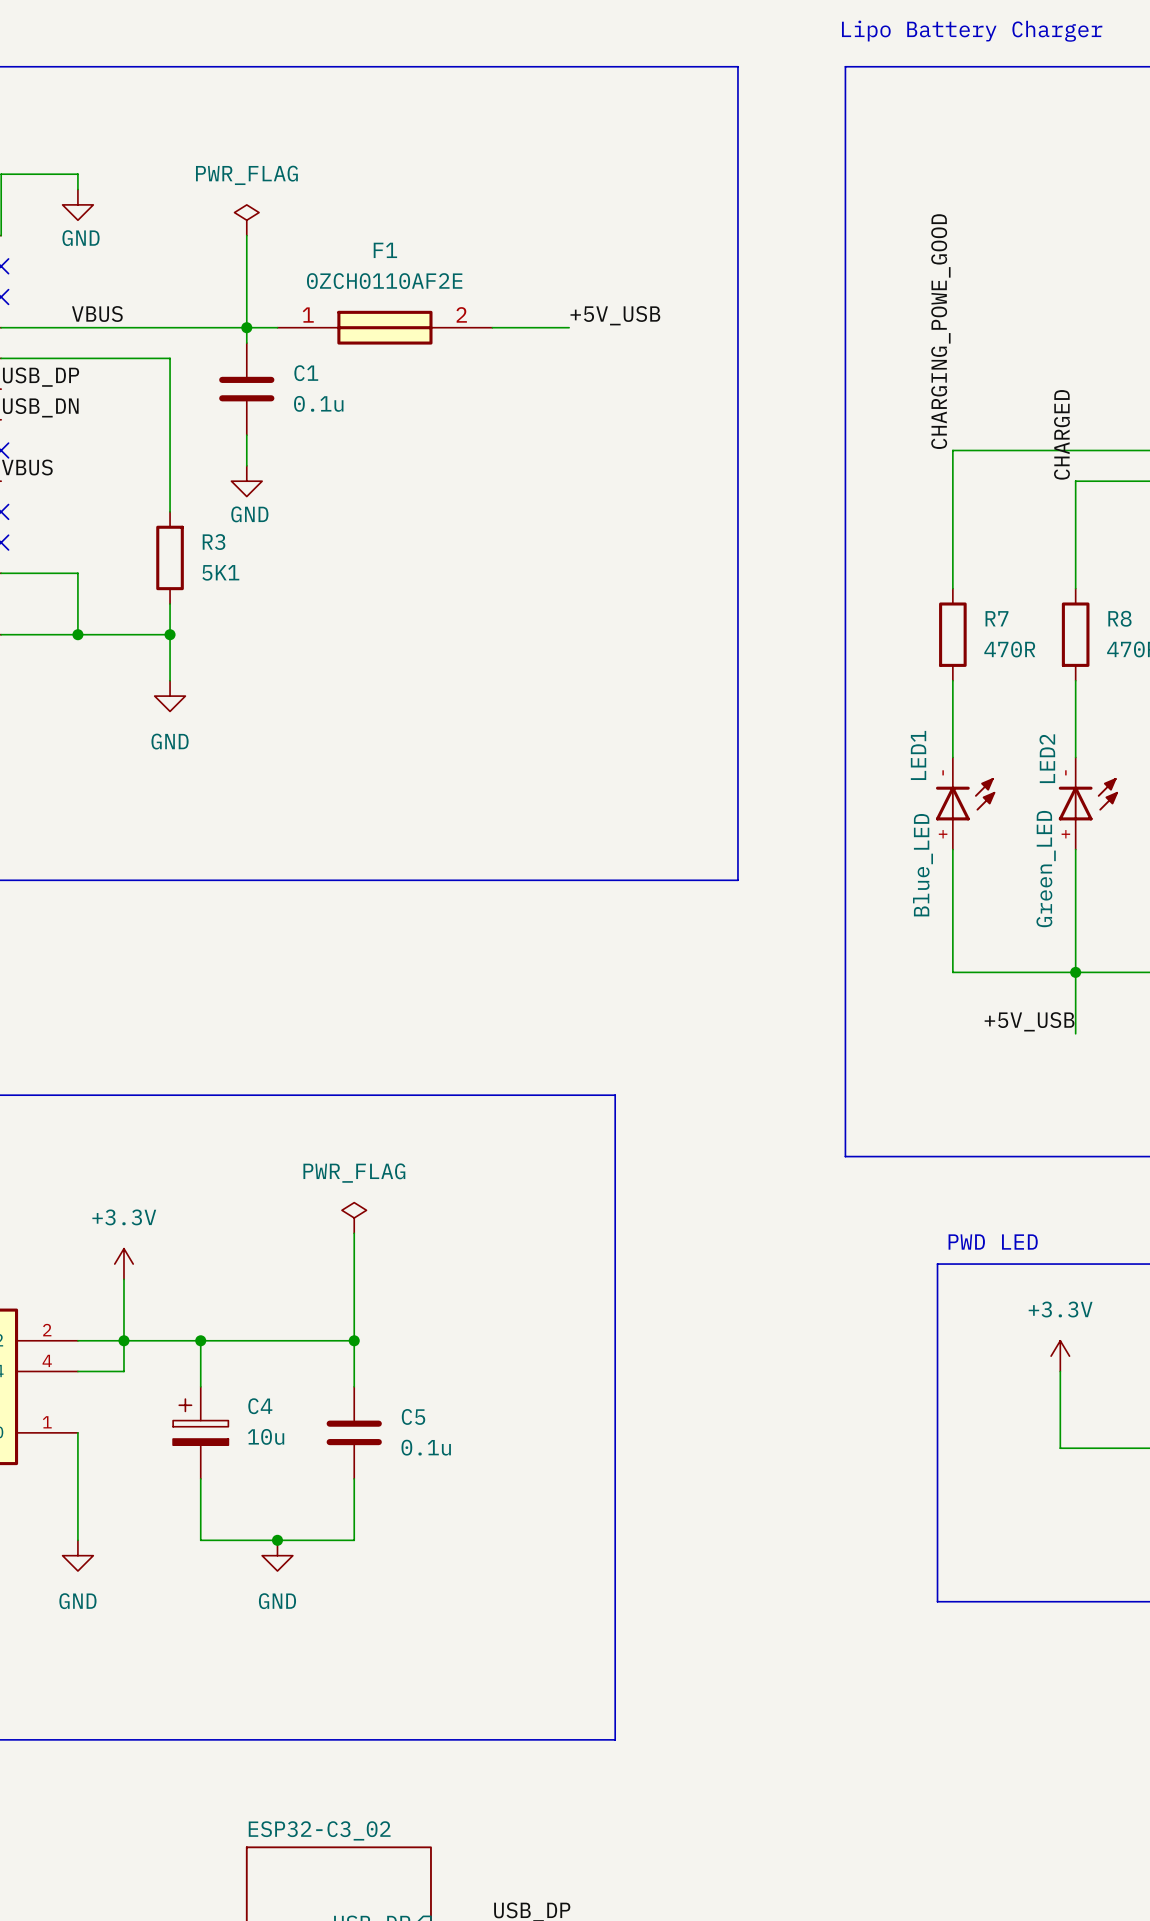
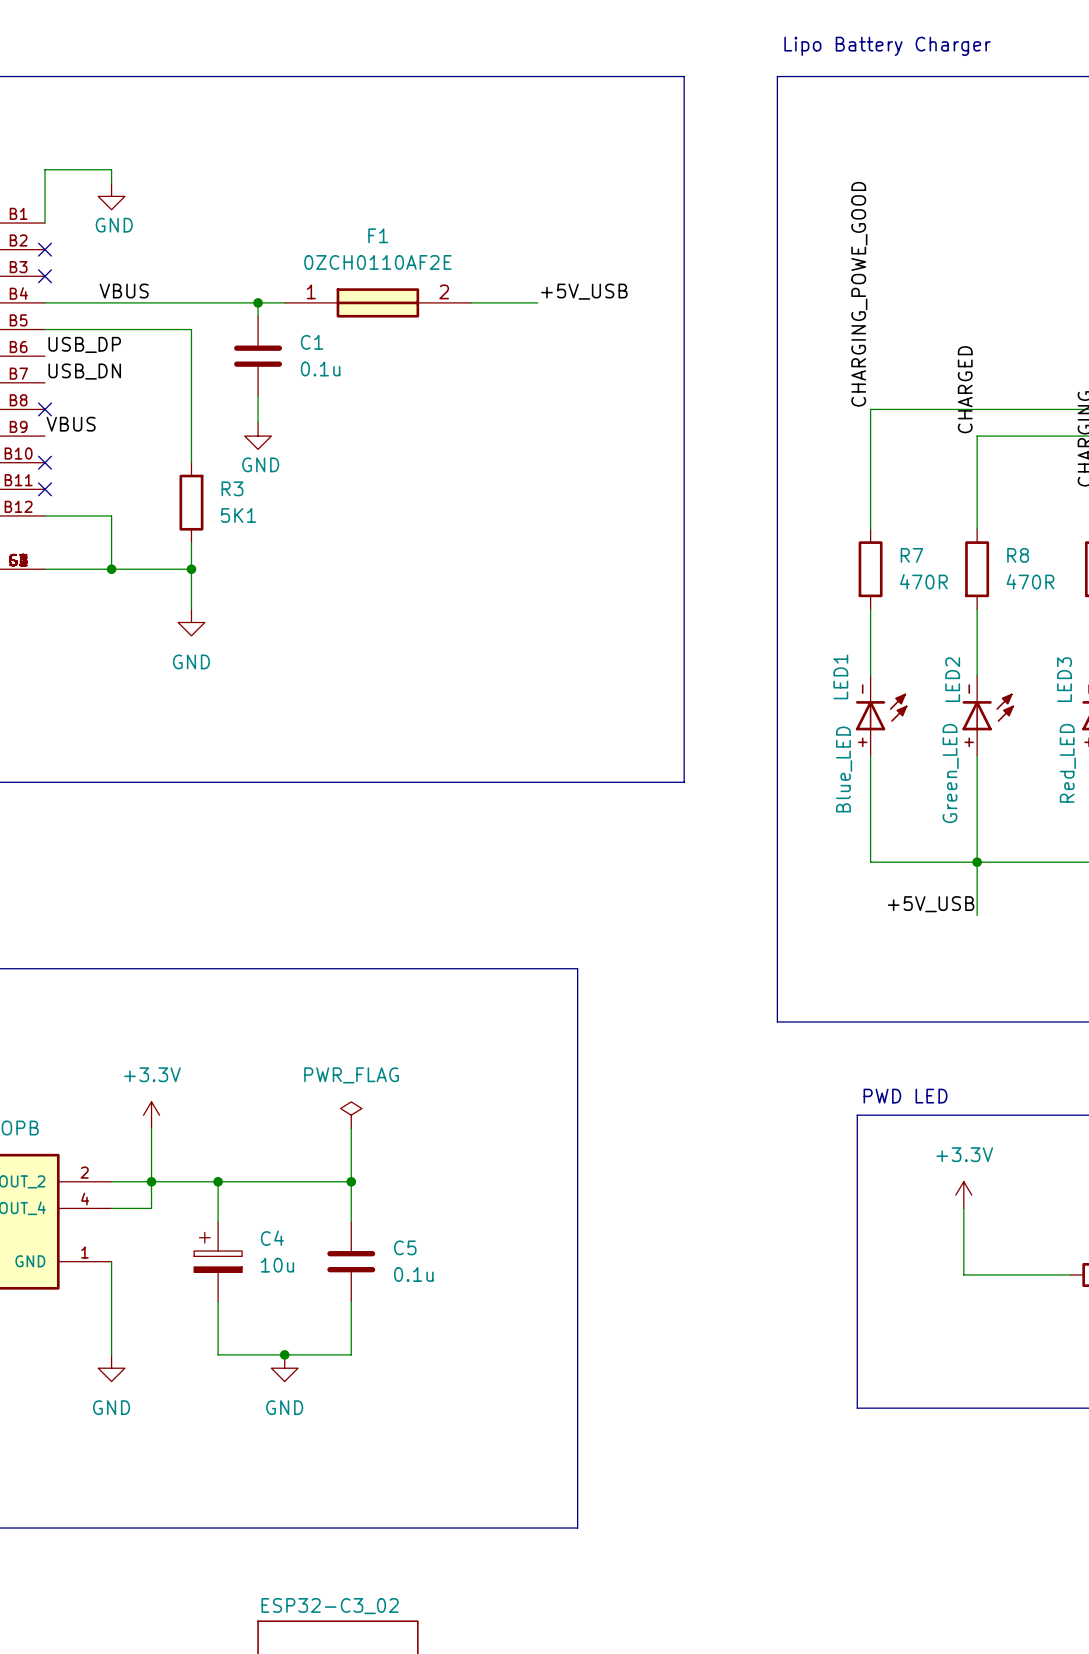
power symbol: PWR_FLAG (246, 220) -> none
wire: (246, 235) (246, 327) -> none
power symbol position: PWR_FLAG (354, 1217) -> PWR_FLAG (351, 1115)
wire: (354, 1233) (354, 1279) -> none

